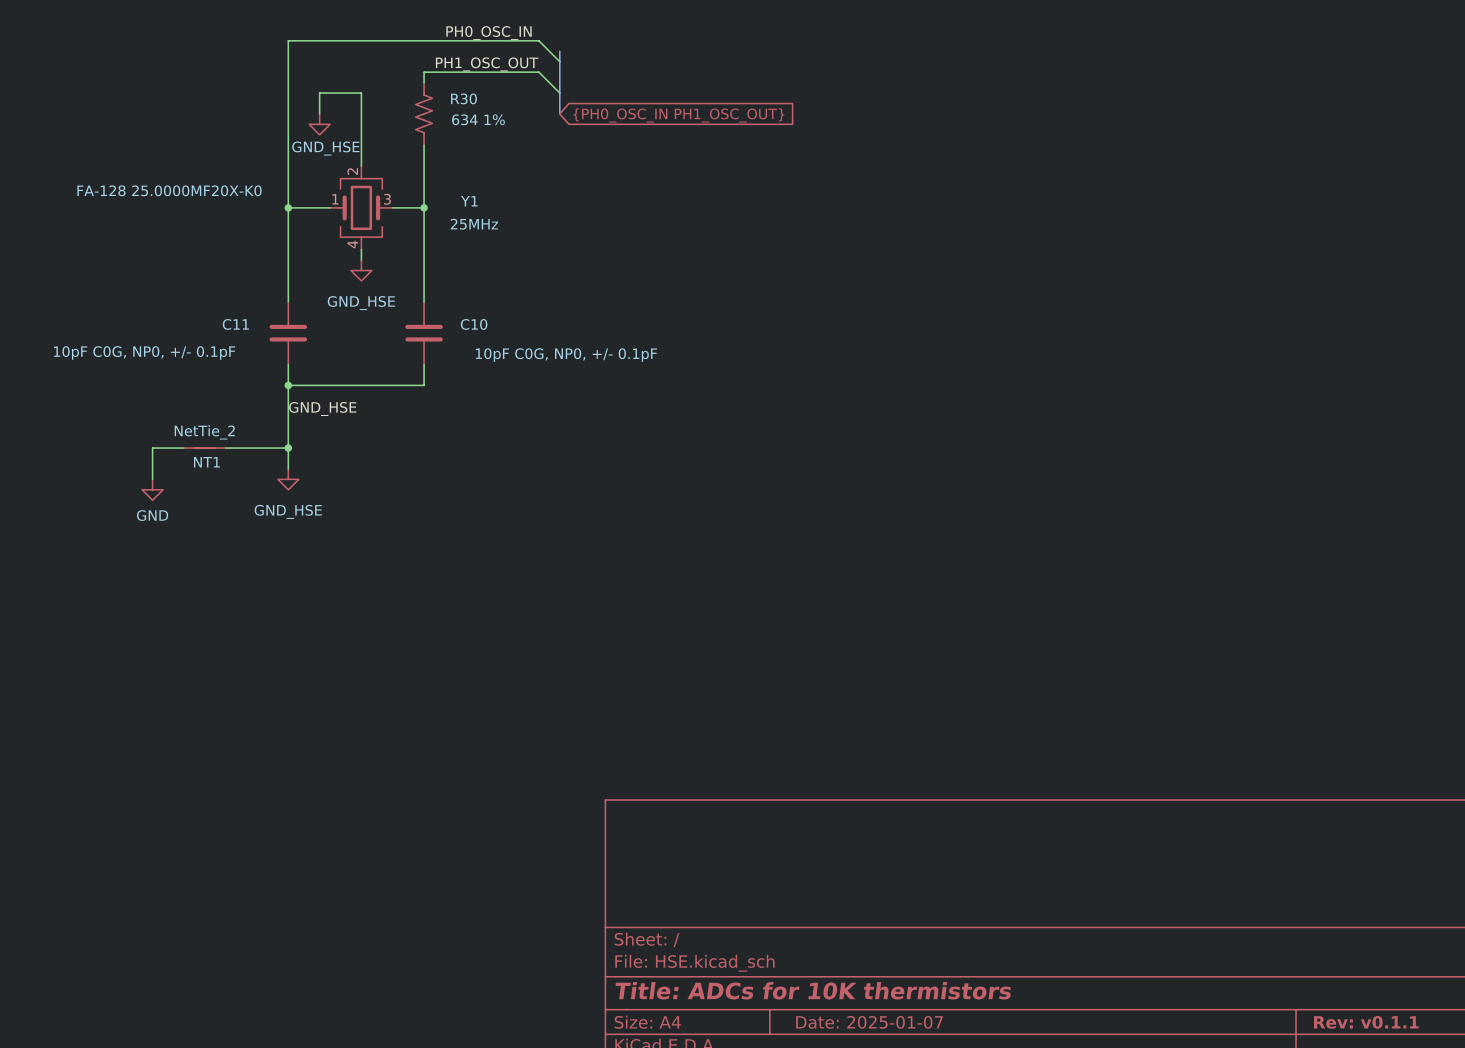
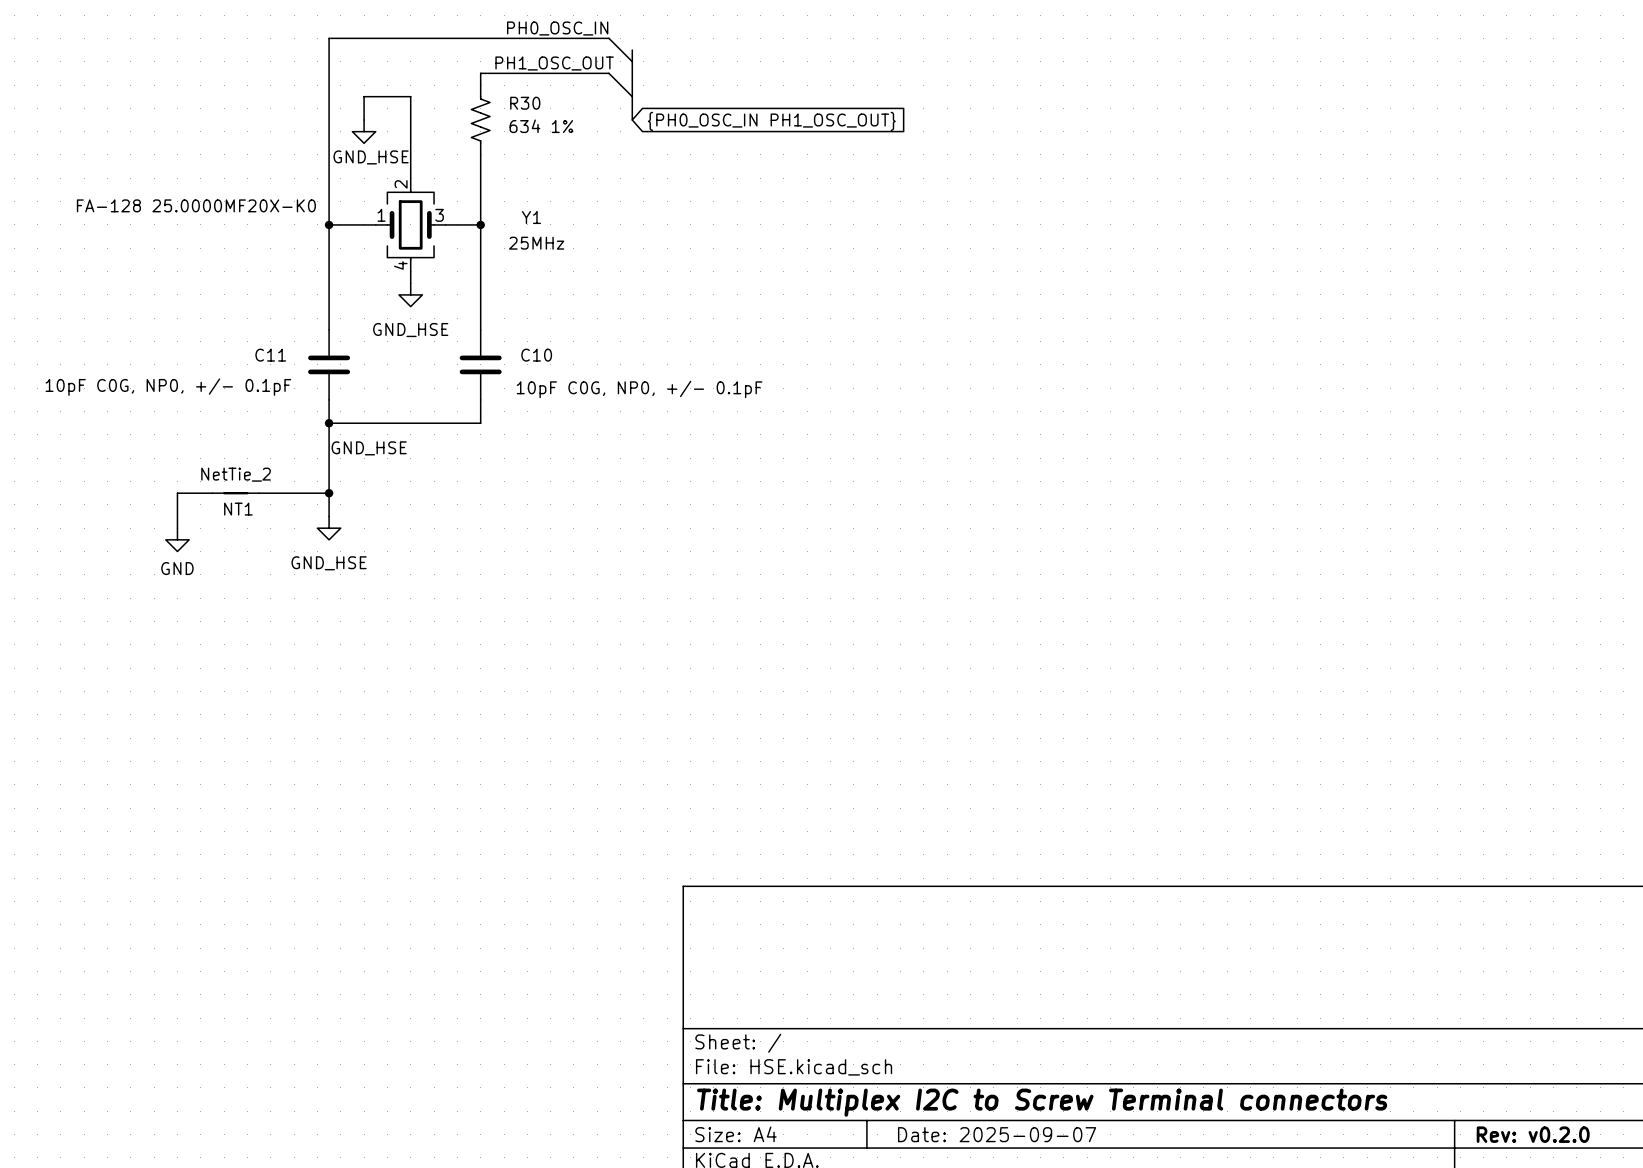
title block: Title: ADCs for 10K thermistors (813, 990) -> Title: Multiplex I2C to Screw Terminal connectors (1042, 1102)
title block: Date: 2025-01-07 (869, 1022) -> Date: 2025-09-07 (997, 1134)
title block: Rev: v0.1.1 (1366, 1022) -> Rev: v0.2.0 (1533, 1134)

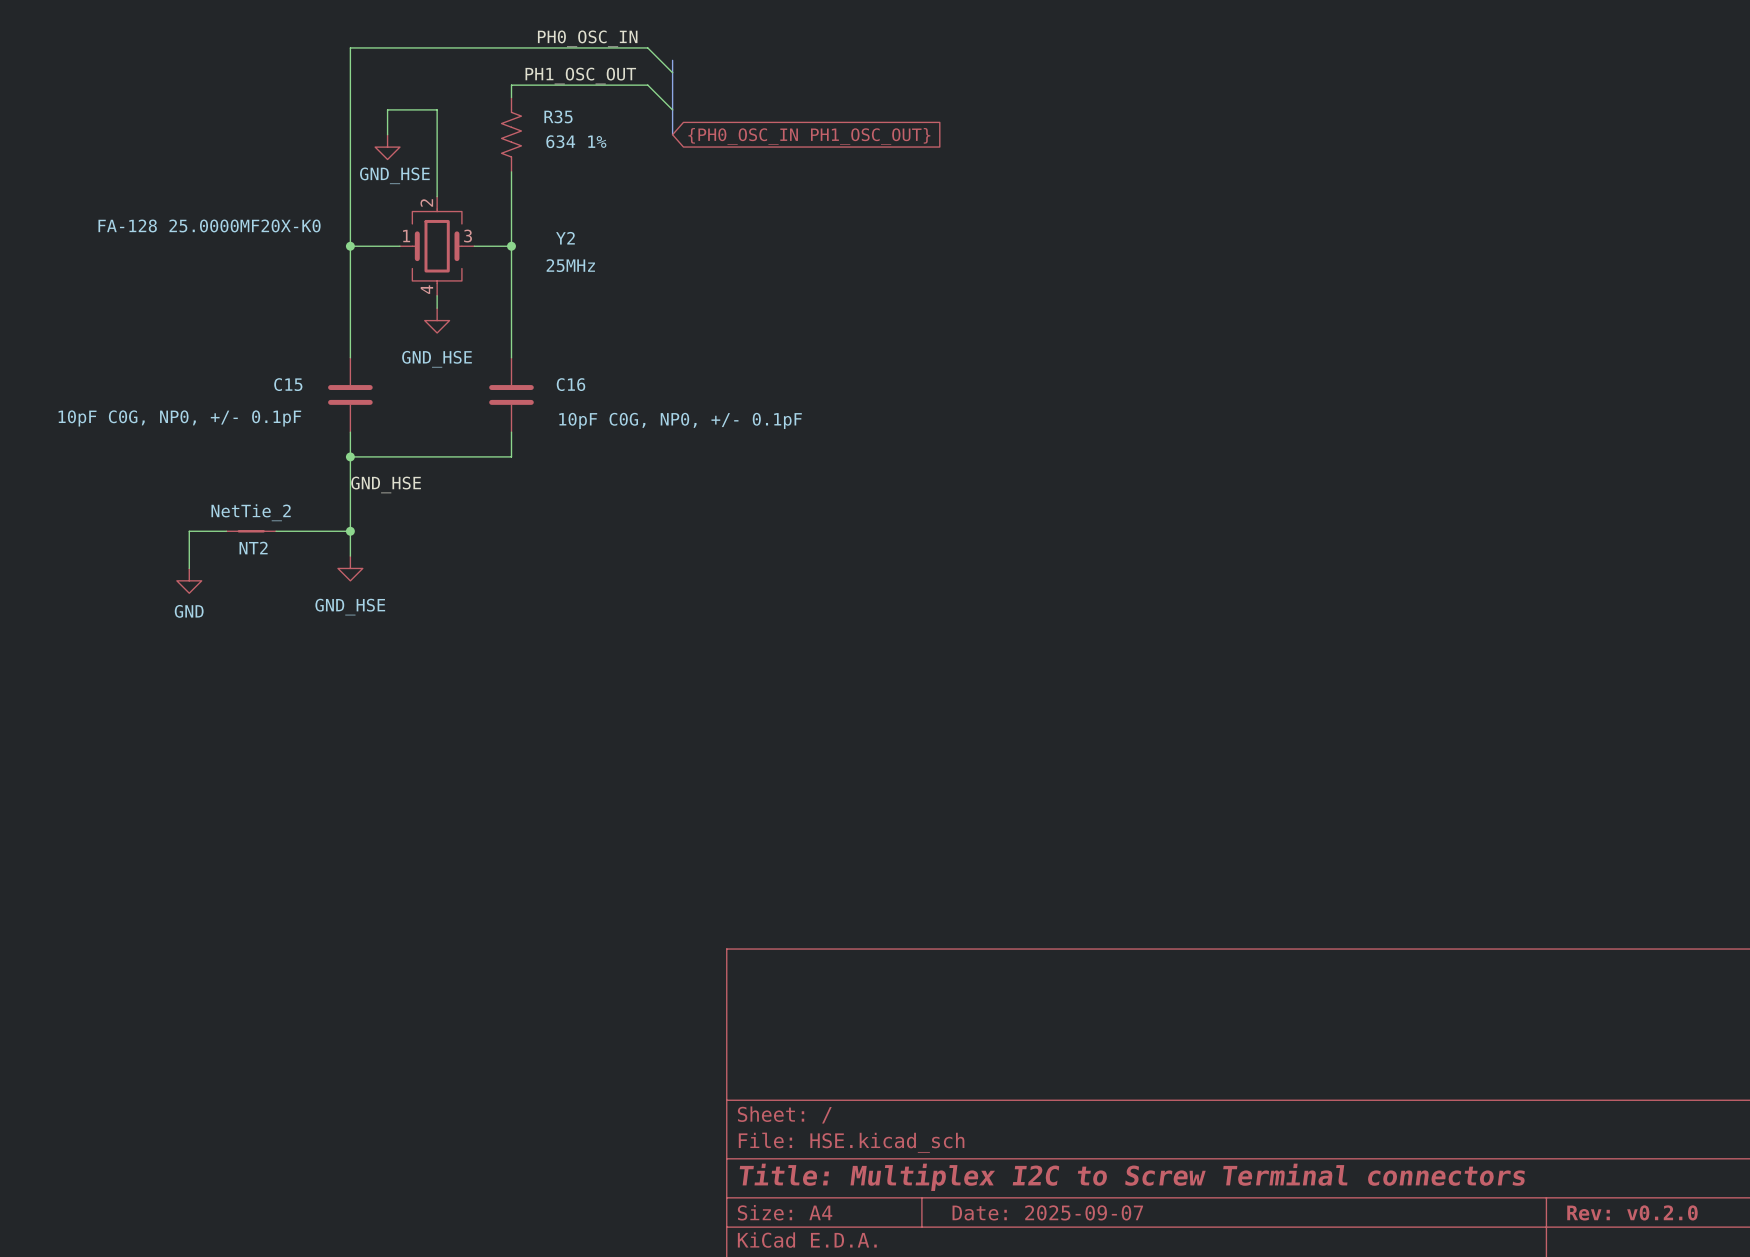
R30 name: R30 (525, 103) -> R35 (558, 116)
Y1 name: Y1 (531, 217) -> Y2 (565, 238)
C11 name: C11 (270, 355) -> C15 (288, 384)
C10 name: C10 (536, 355) -> C16 (571, 384)
NT1 name: NT1 (238, 509) -> NT2 (253, 548)

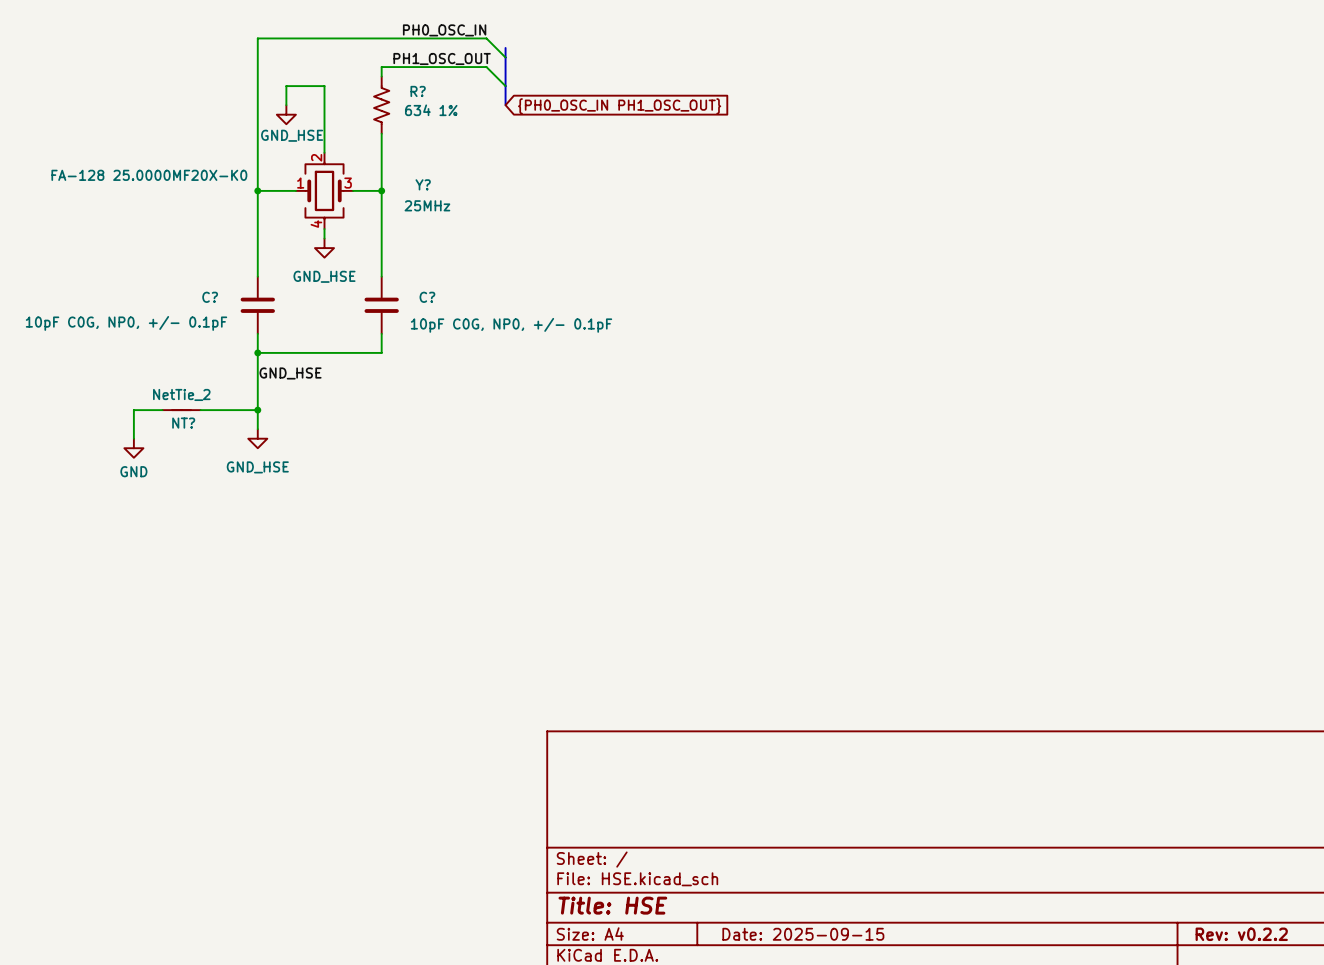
R35 name: R35 (558, 116) -> R? (418, 91)
Y2 name: Y2 (565, 238) -> Y? (423, 184)
C15 name: C15 (288, 384) -> C? (210, 297)
C16 name: C16 (571, 384) -> C? (427, 297)
NT2 name: NT2 (253, 548) -> NT? (183, 423)
title block: Title: Multiplex I2C to Screw Terminal connectors (1132, 1177) -> Title: HSE (612, 905)
title block: Date: 2025-09-07 (1047, 1212) -> Date: 2025-09-15 (803, 934)
title block: Rev: v0.2.0 (1632, 1212) -> Rev: v0.2.2 (1241, 934)

